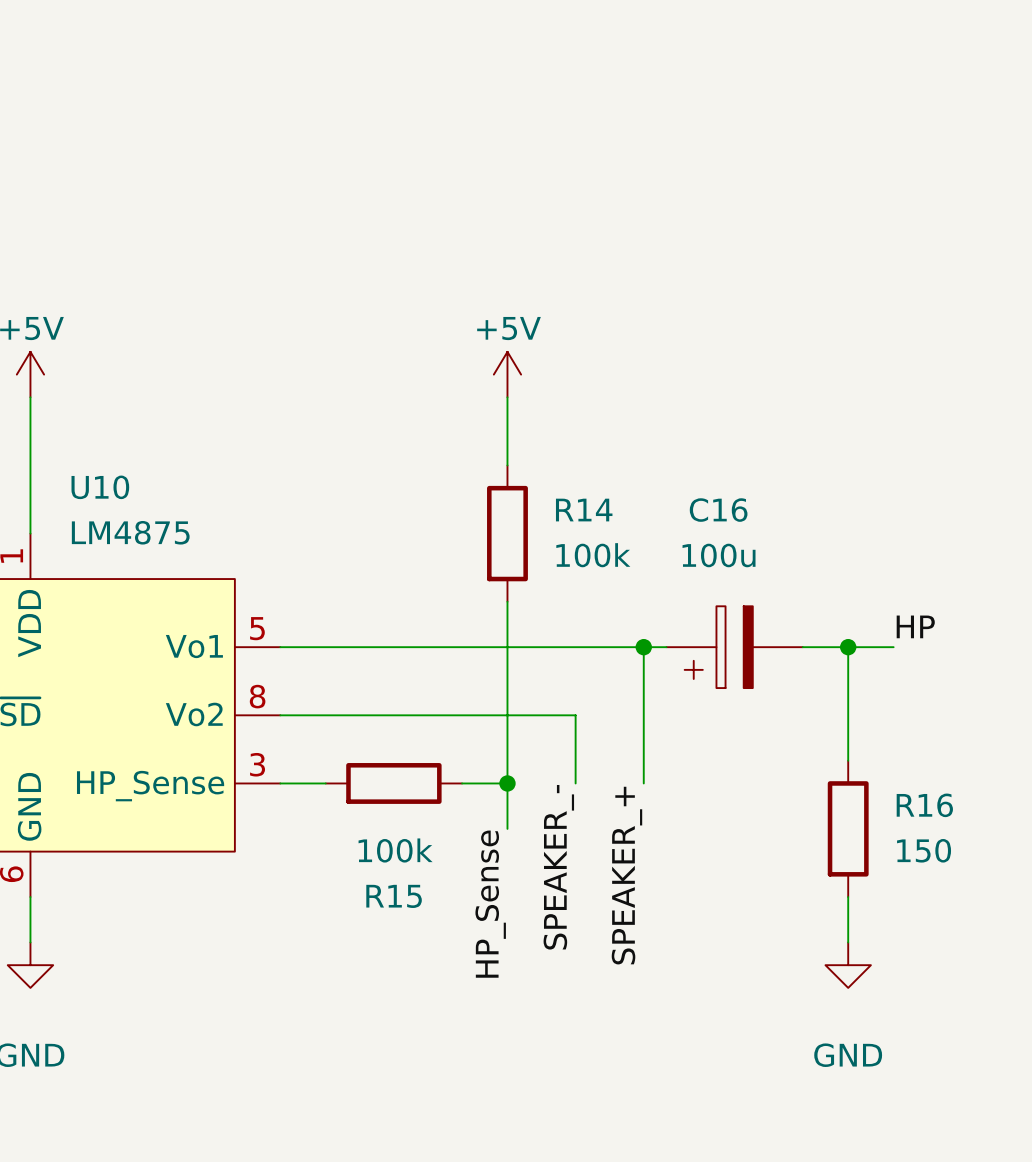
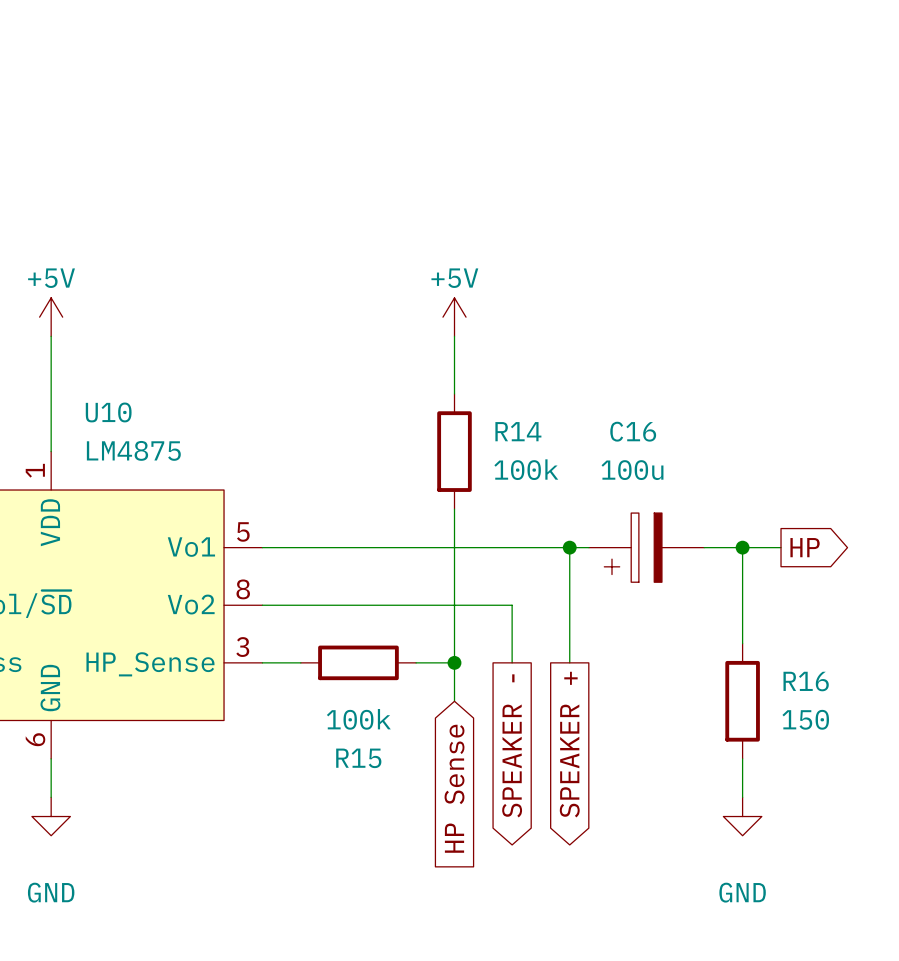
label: HP (915, 626) -> none
global label: none -> HP (805, 547)
label: SPEAKER_- (558, 867) -> none
global label: none -> SPEAKER - (512, 745)
label: SPEAKER_+ (626, 875) -> none
global label: none -> SPEAKER + (569, 744)
label: HP_Sense (490, 904) -> none
global label: none -> HP Sense (454, 788)

